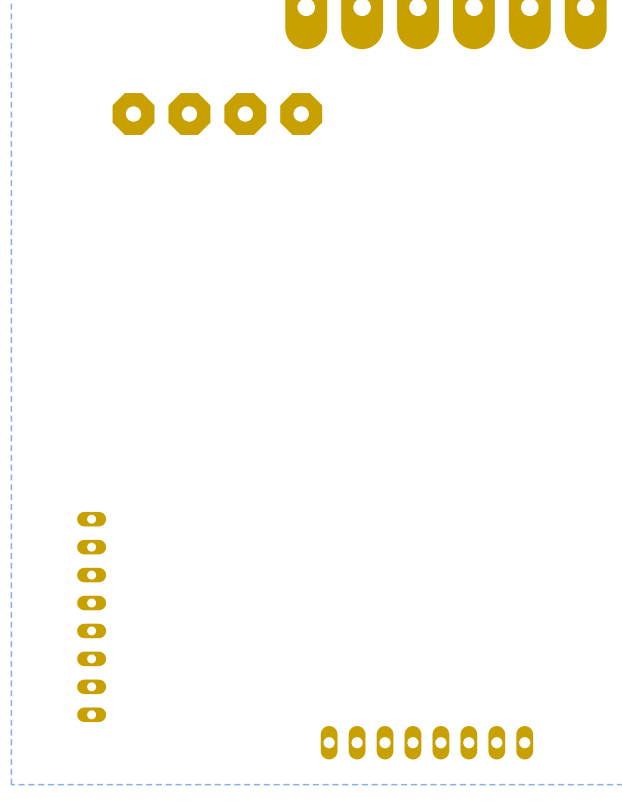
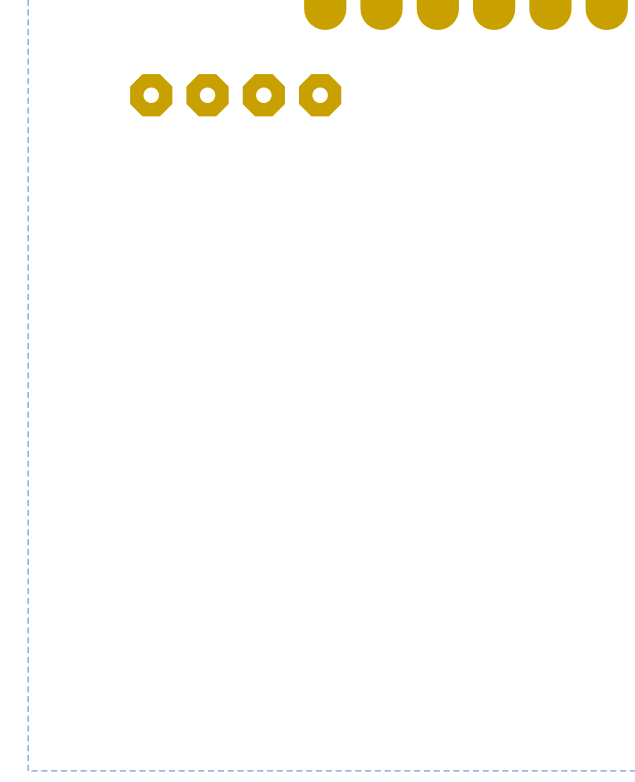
part: (91, 616) -> none
part: (426, 742) -> none

